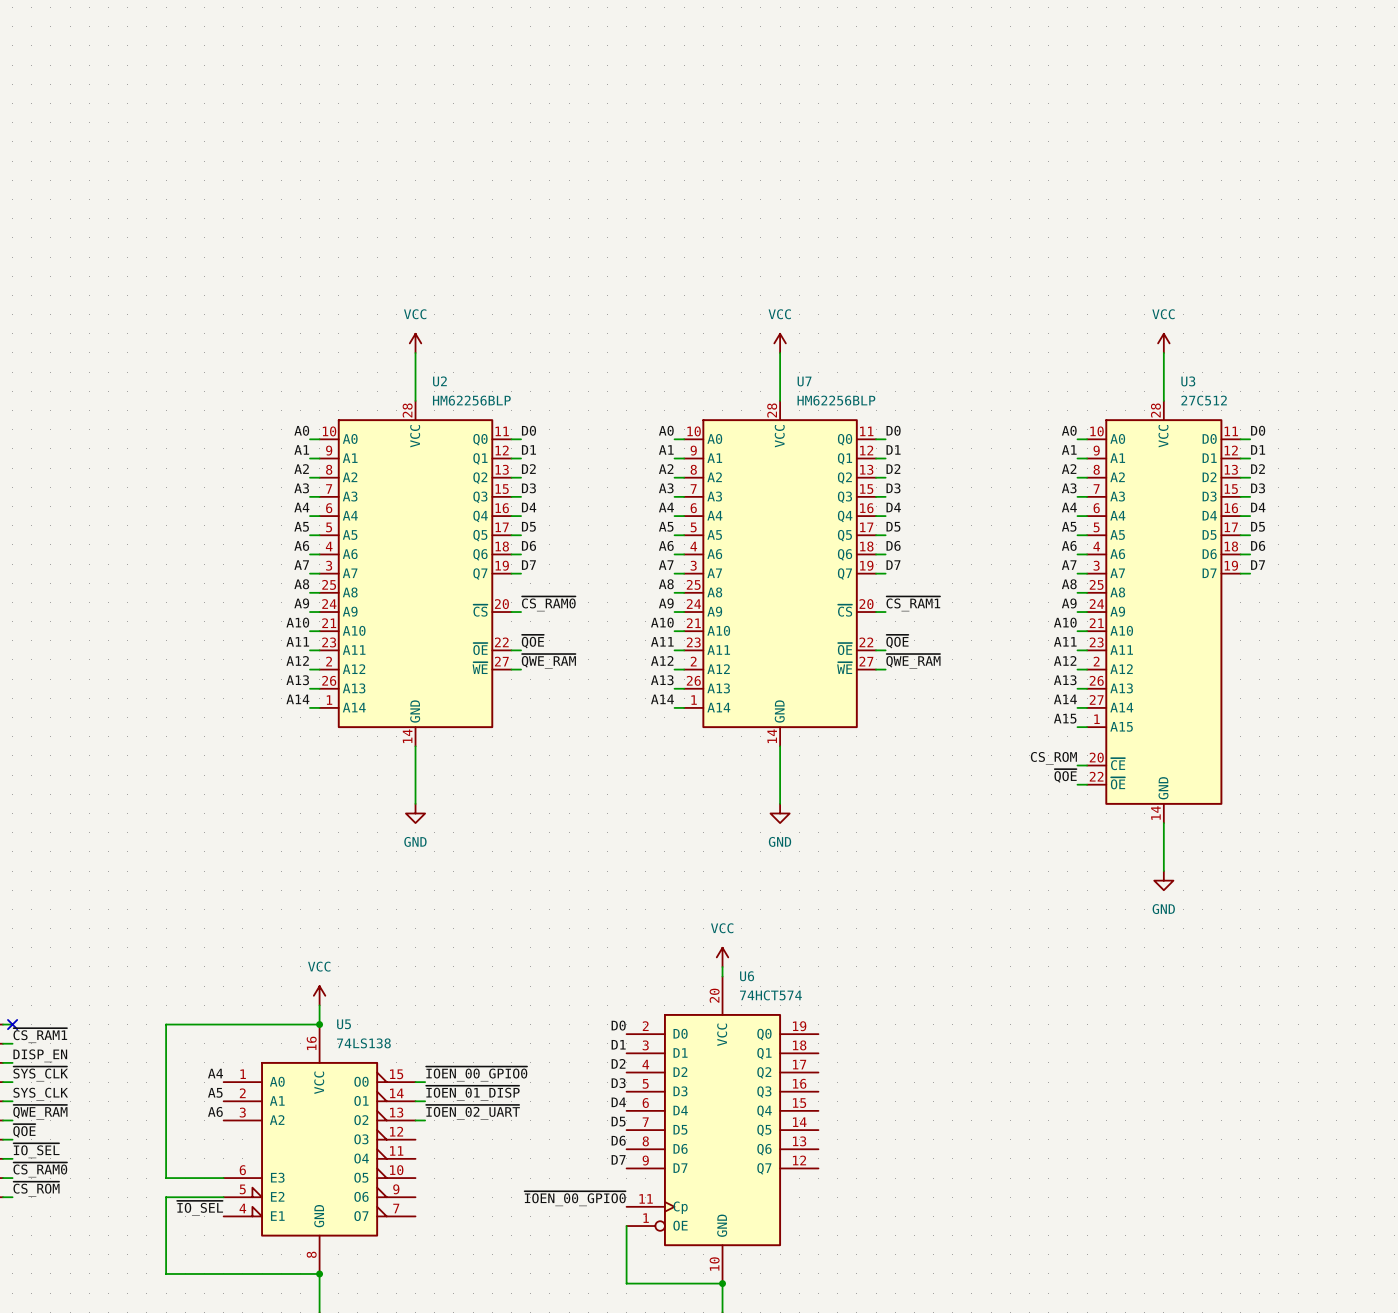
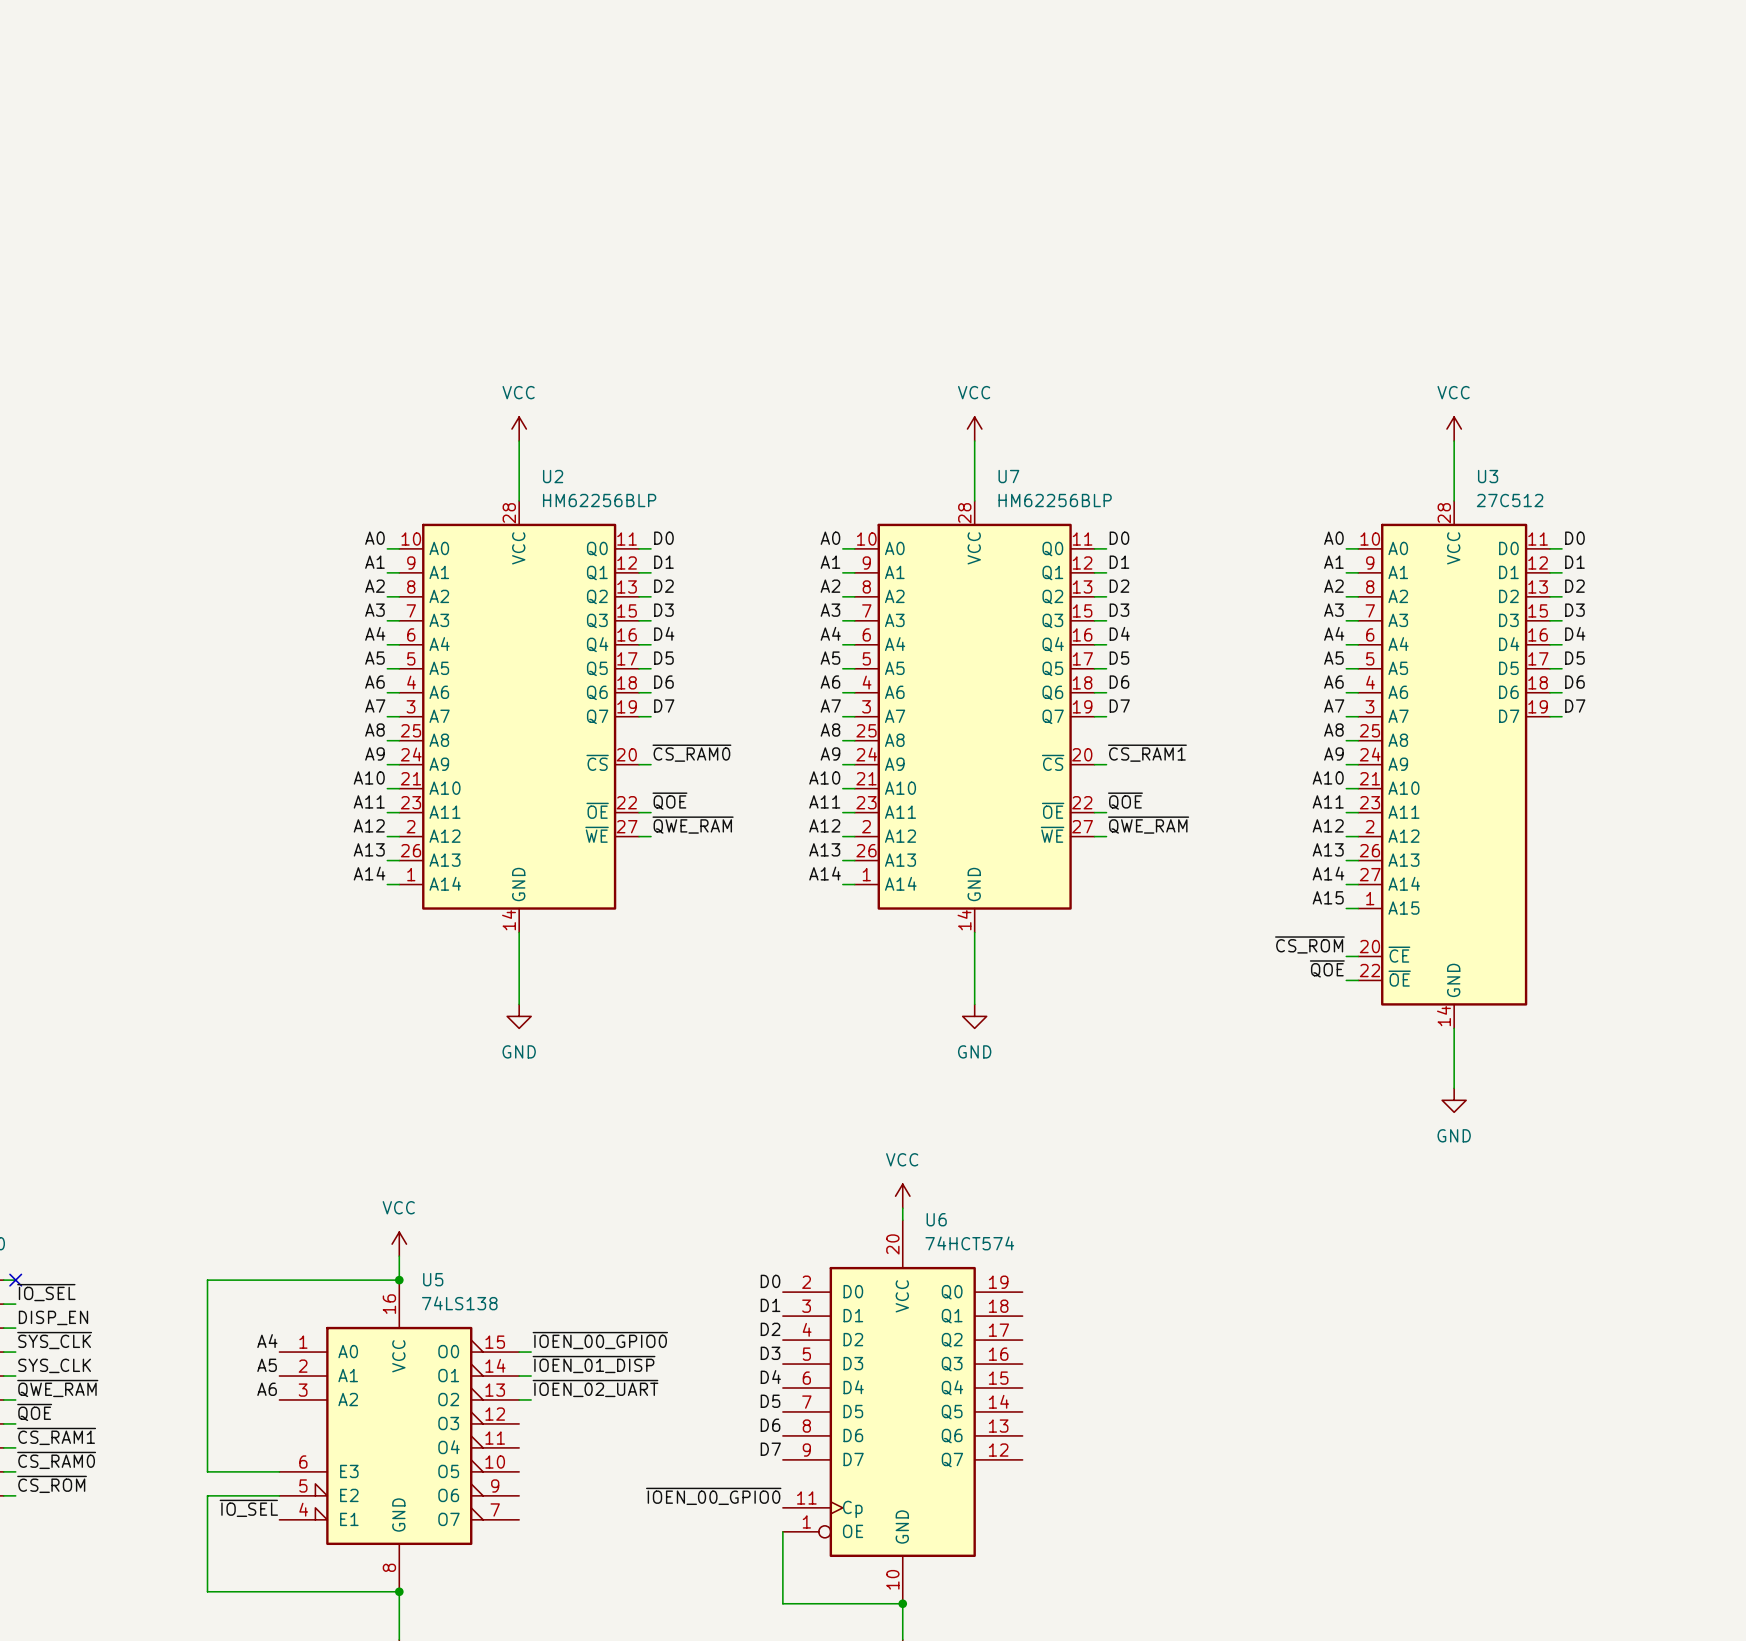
label: CS_ROM (1053, 758) -> ~{CS_ROM} (1309, 944)
label: ~{CS_RAM1} (40, 1035) -> ~{IO_SEL} (46, 1292)
label: ~{IO_SEL} (36, 1150) -> ~{CS_RAM1} (56, 1436)

